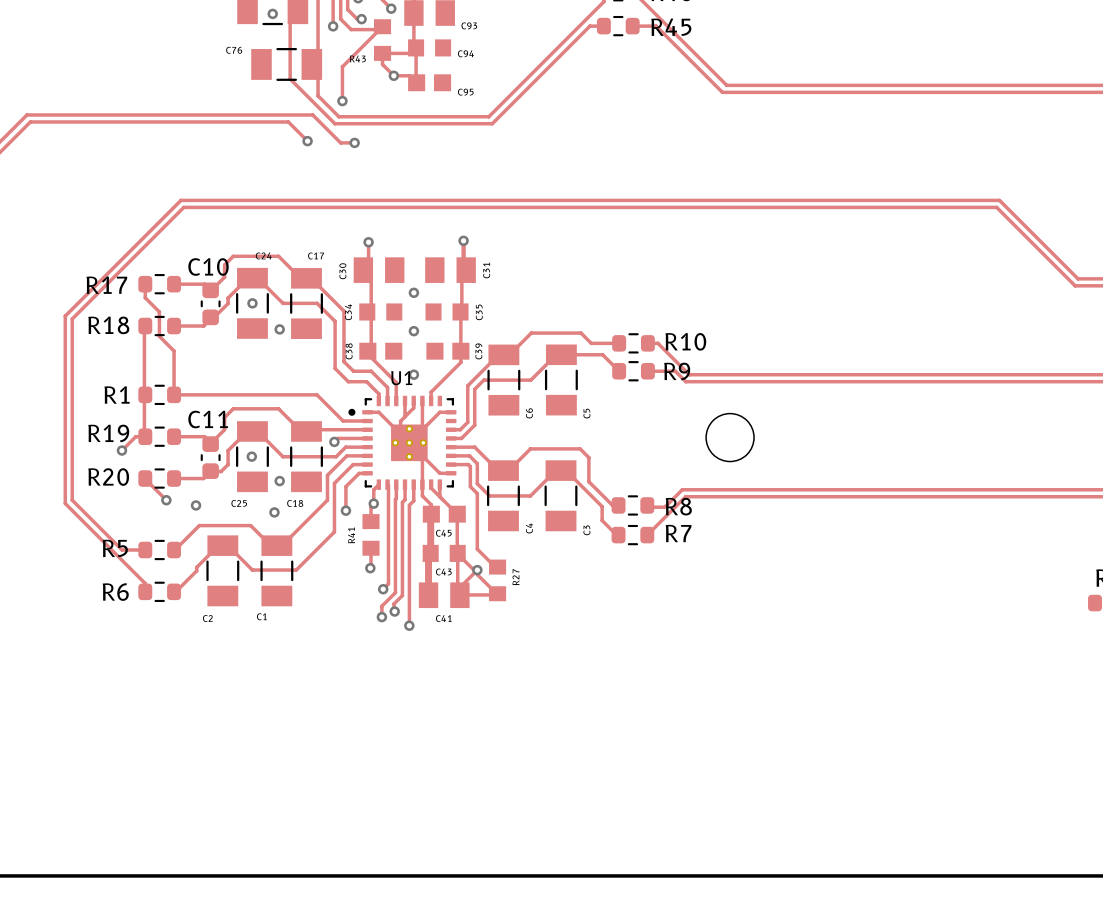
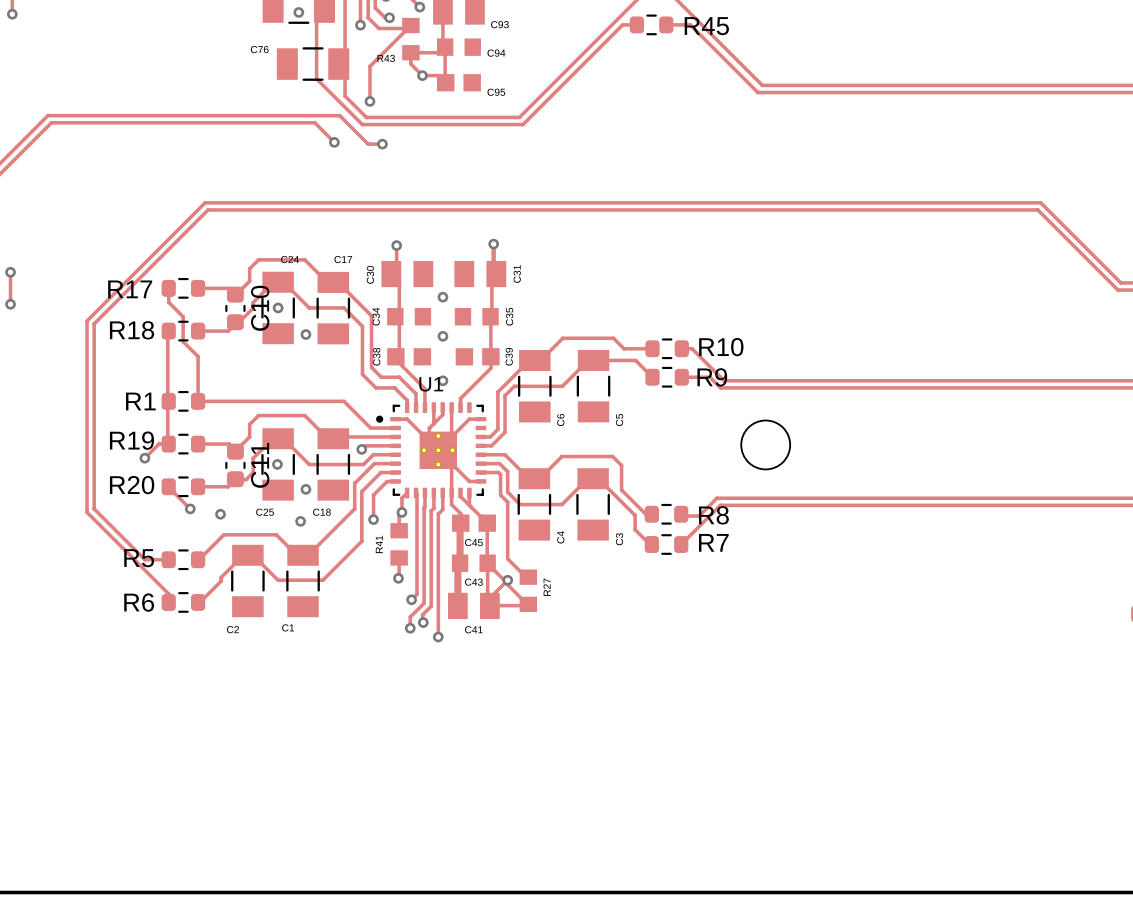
C10 name rotation: 0° (208, 266) -> 90° counterclockwise (260, 308)
C11 name rotation: 0° (208, 419) -> 90° counterclockwise (260, 465)

